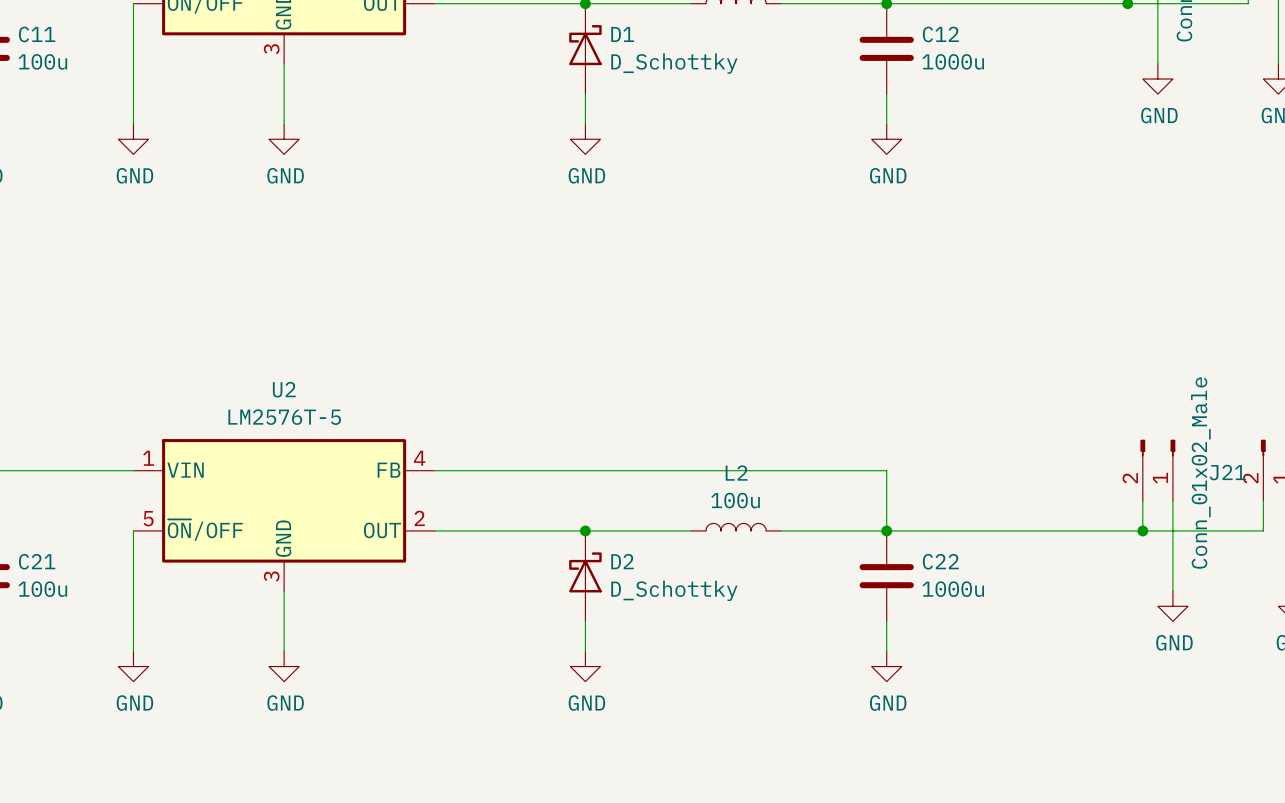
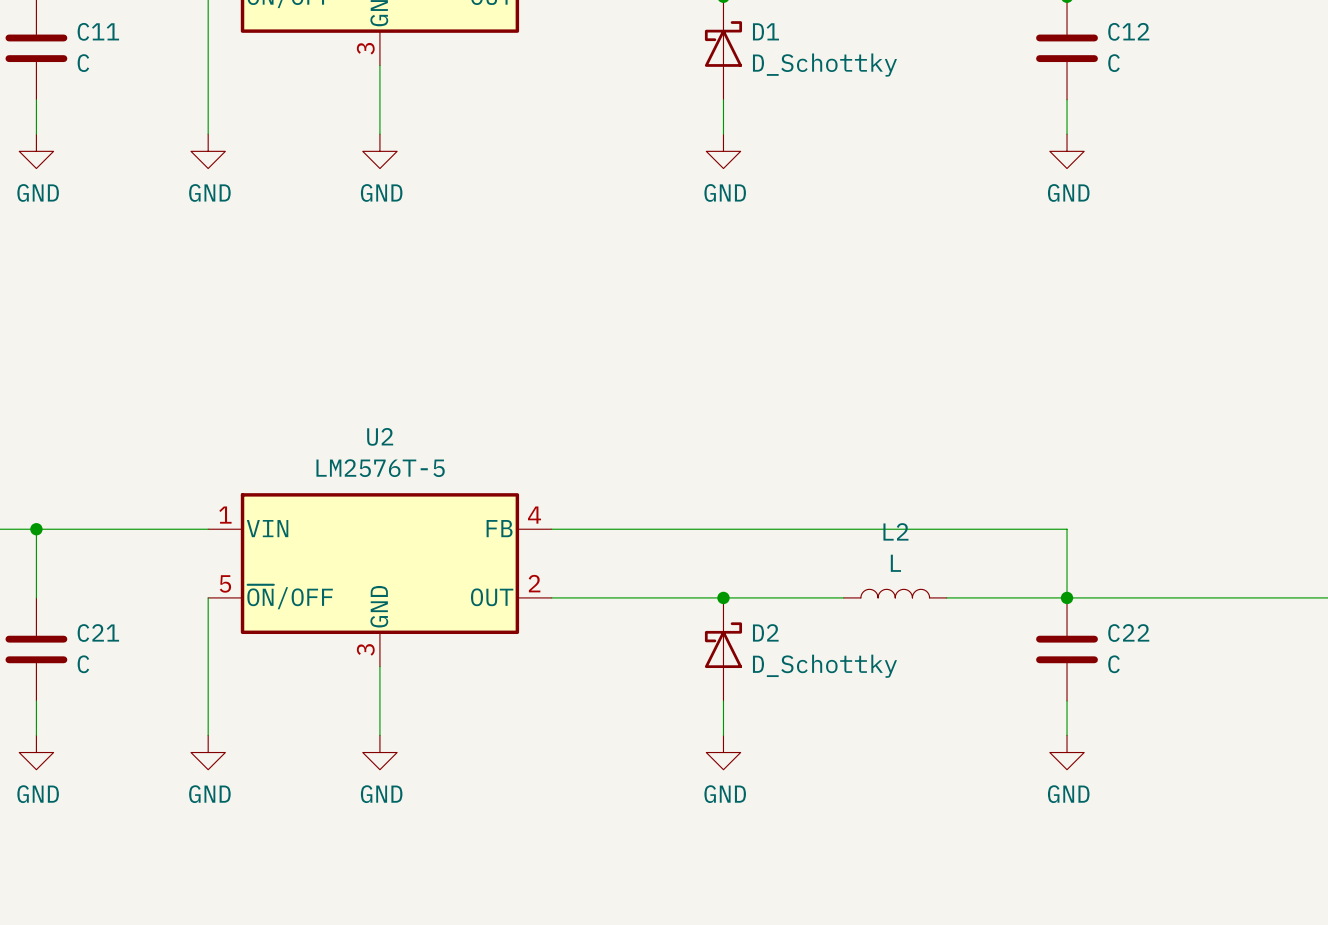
C11 value: 100u (42, 61) -> C (83, 63)
C12 value: 1000u (953, 61) -> C (1113, 63)
L2 value: 100u (735, 500) -> L (895, 563)
C21 value: 100u (42, 589) -> C (83, 664)
C22 value: 1000u (953, 589) -> C (1113, 664)

